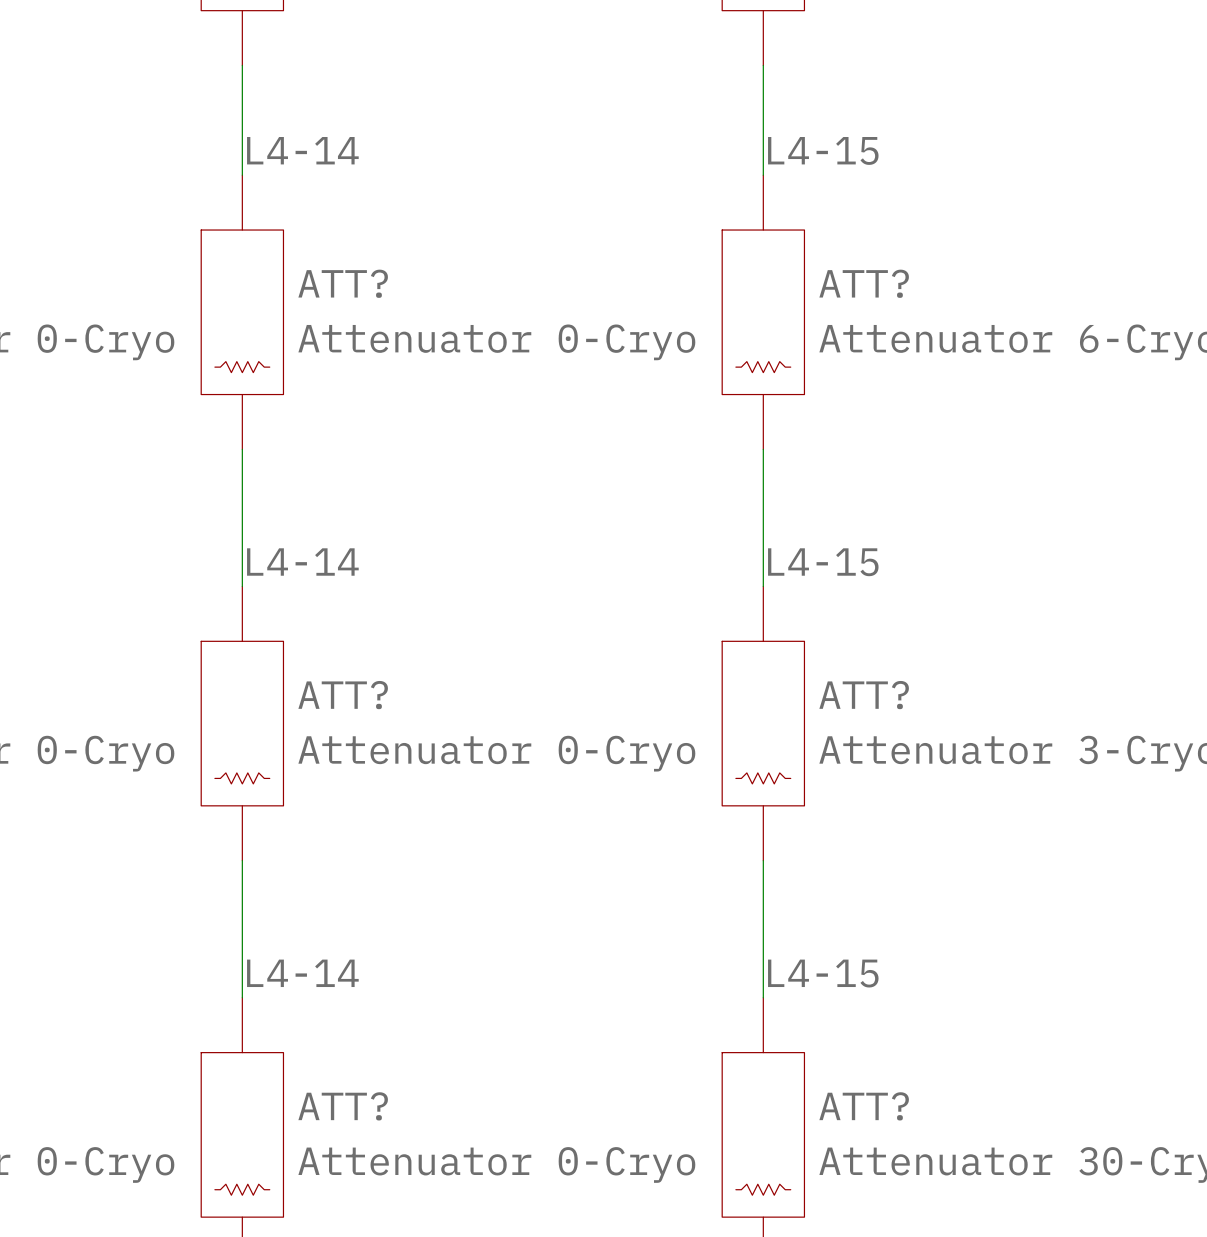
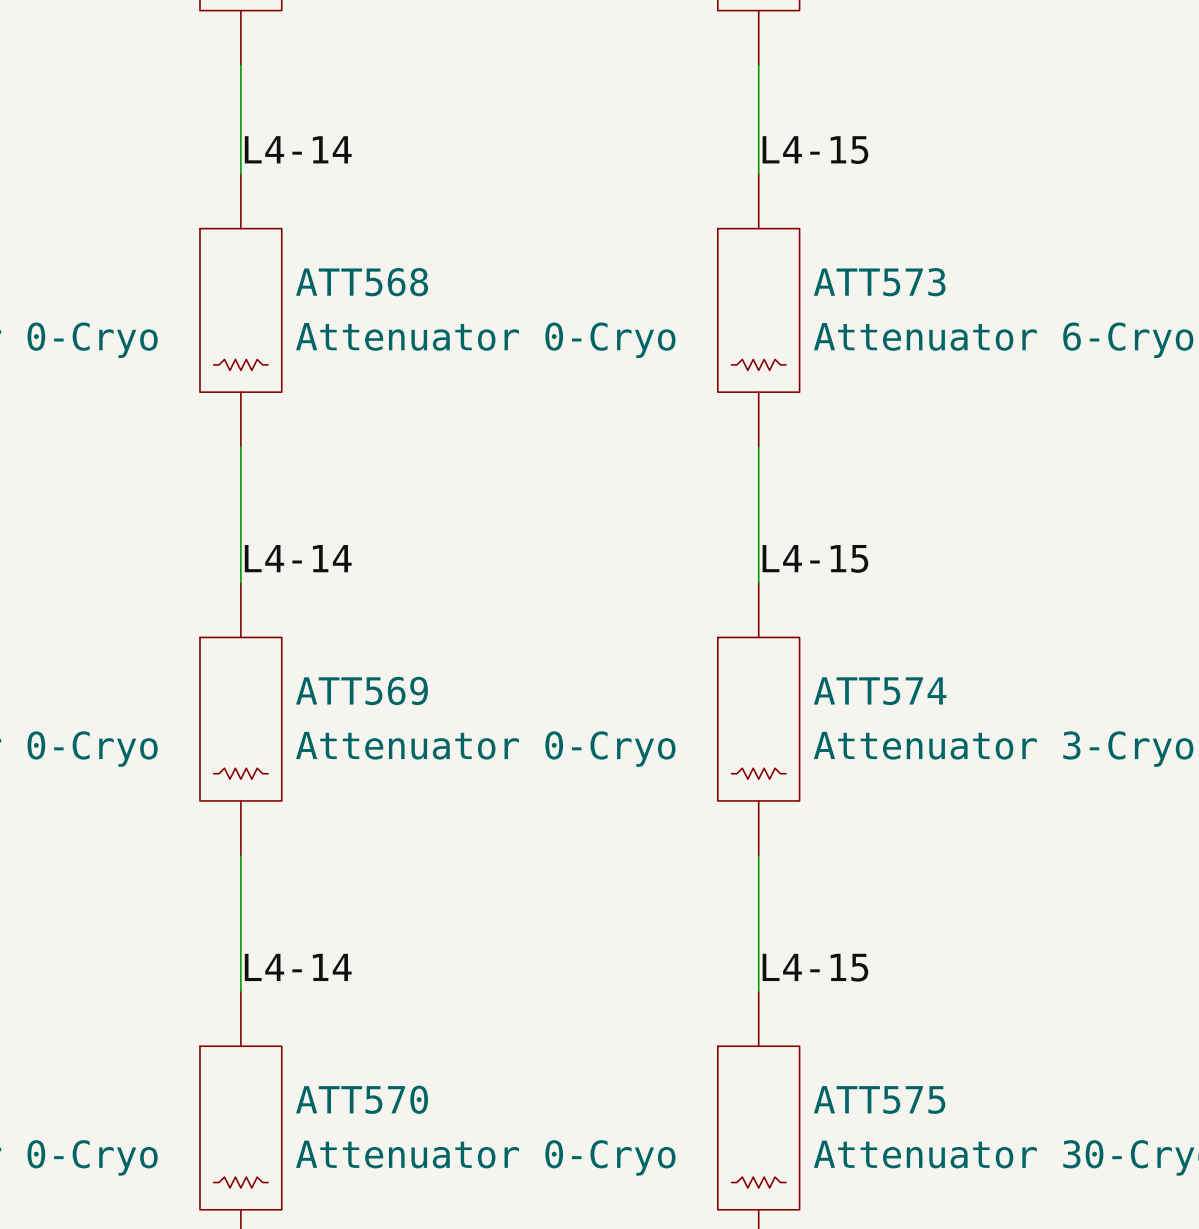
ATT? name: ATT? (343, 283) -> ATT568 (362, 282)
ATT? name: ATT? (864, 283) -> ATT573 (879, 282)
ATT? name: ATT? (343, 695) -> ATT569 (361, 690)
ATT? name: ATT? (864, 695) -> ATT574 (880, 691)
ATT? name: ATT? (343, 1106) -> ATT570 (362, 1099)
ATT? name: ATT? (864, 1106) -> ATT575 (879, 1100)

